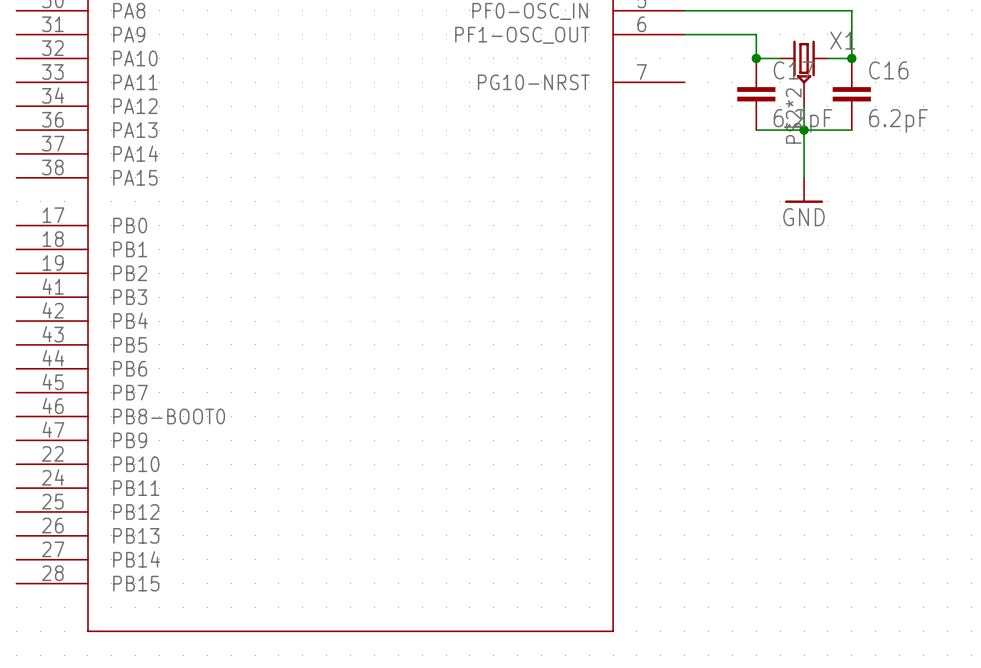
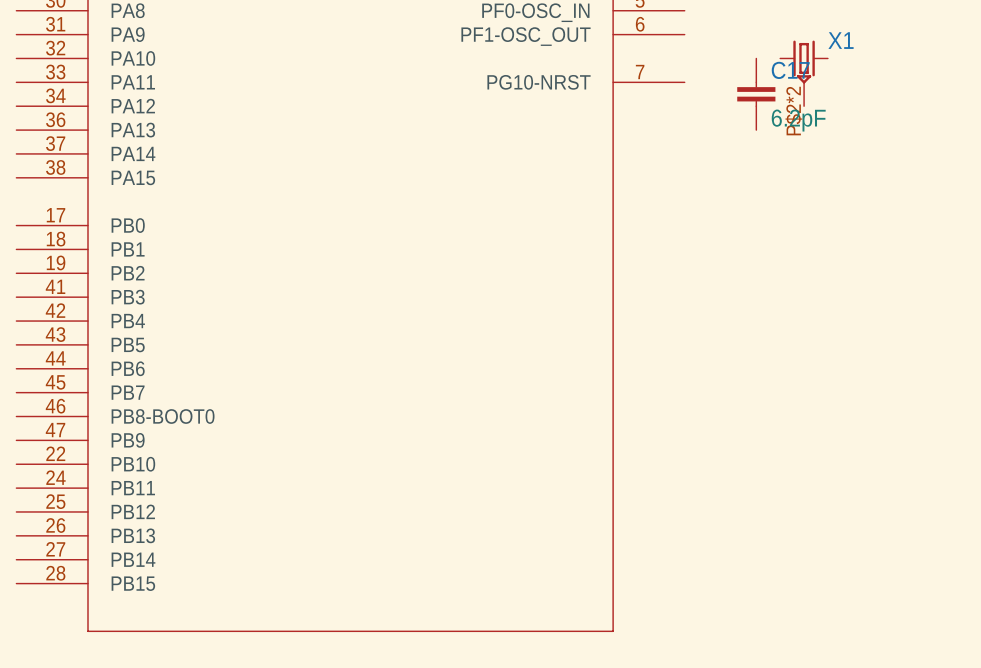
wire: (684, 10) (851, 10) (851, 58) (827, 58) -> none
wire: (684, 34) (756, 34) (756, 58) (780, 58) -> none
junction: (756, 58) -> none
junction: (851, 58) -> none
C16: 6.2pF (851, 94) -> none
wire: (804, 106) (804, 177) -> none
wire: (756, 130) (851, 130) -> none
junction: (804, 130) -> none
power symbol: GND (804, 190) -> none

